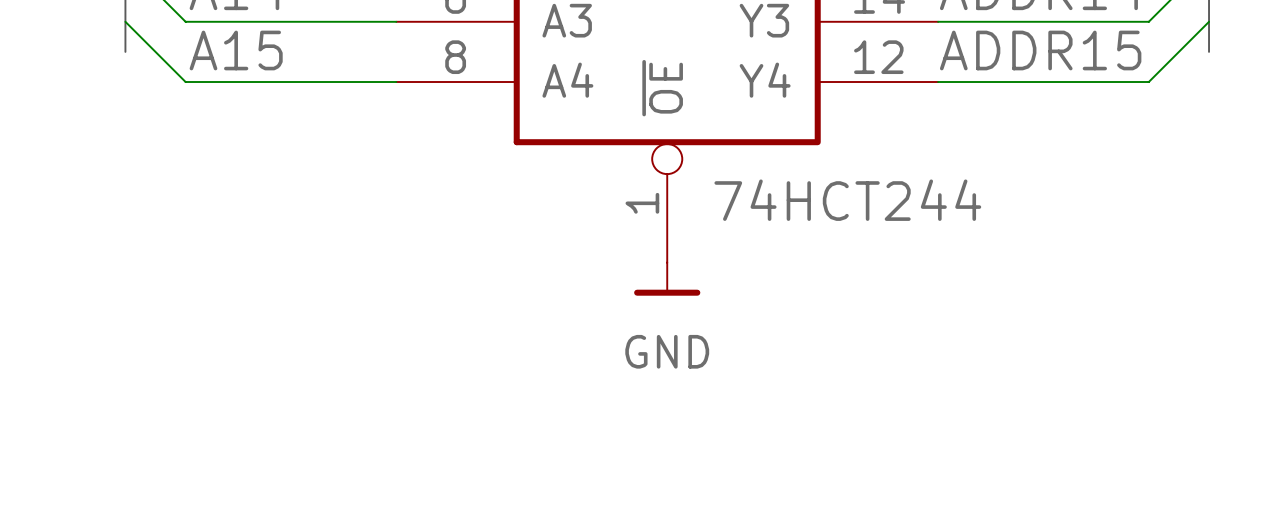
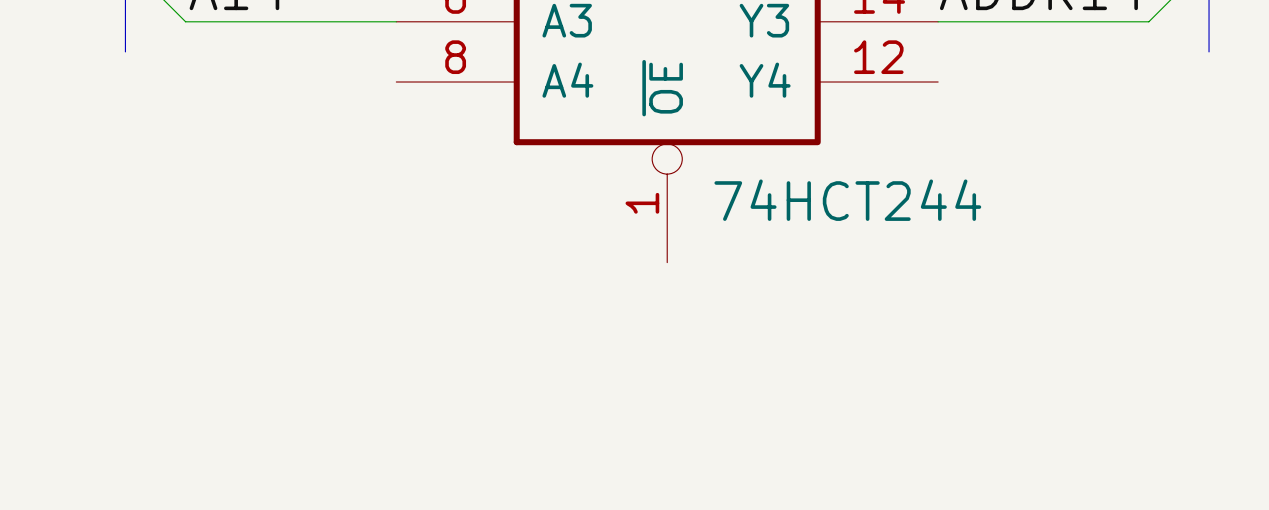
wire: (125, 21) (185, 82) (396, 82) -> none
wire: (1209, 21) (1148, 82) (938, 82) -> none
label: A15 (236, 50) -> none
label: ADDR15 (1040, 50) -> none
power symbol: GND (667, 279) -> none

